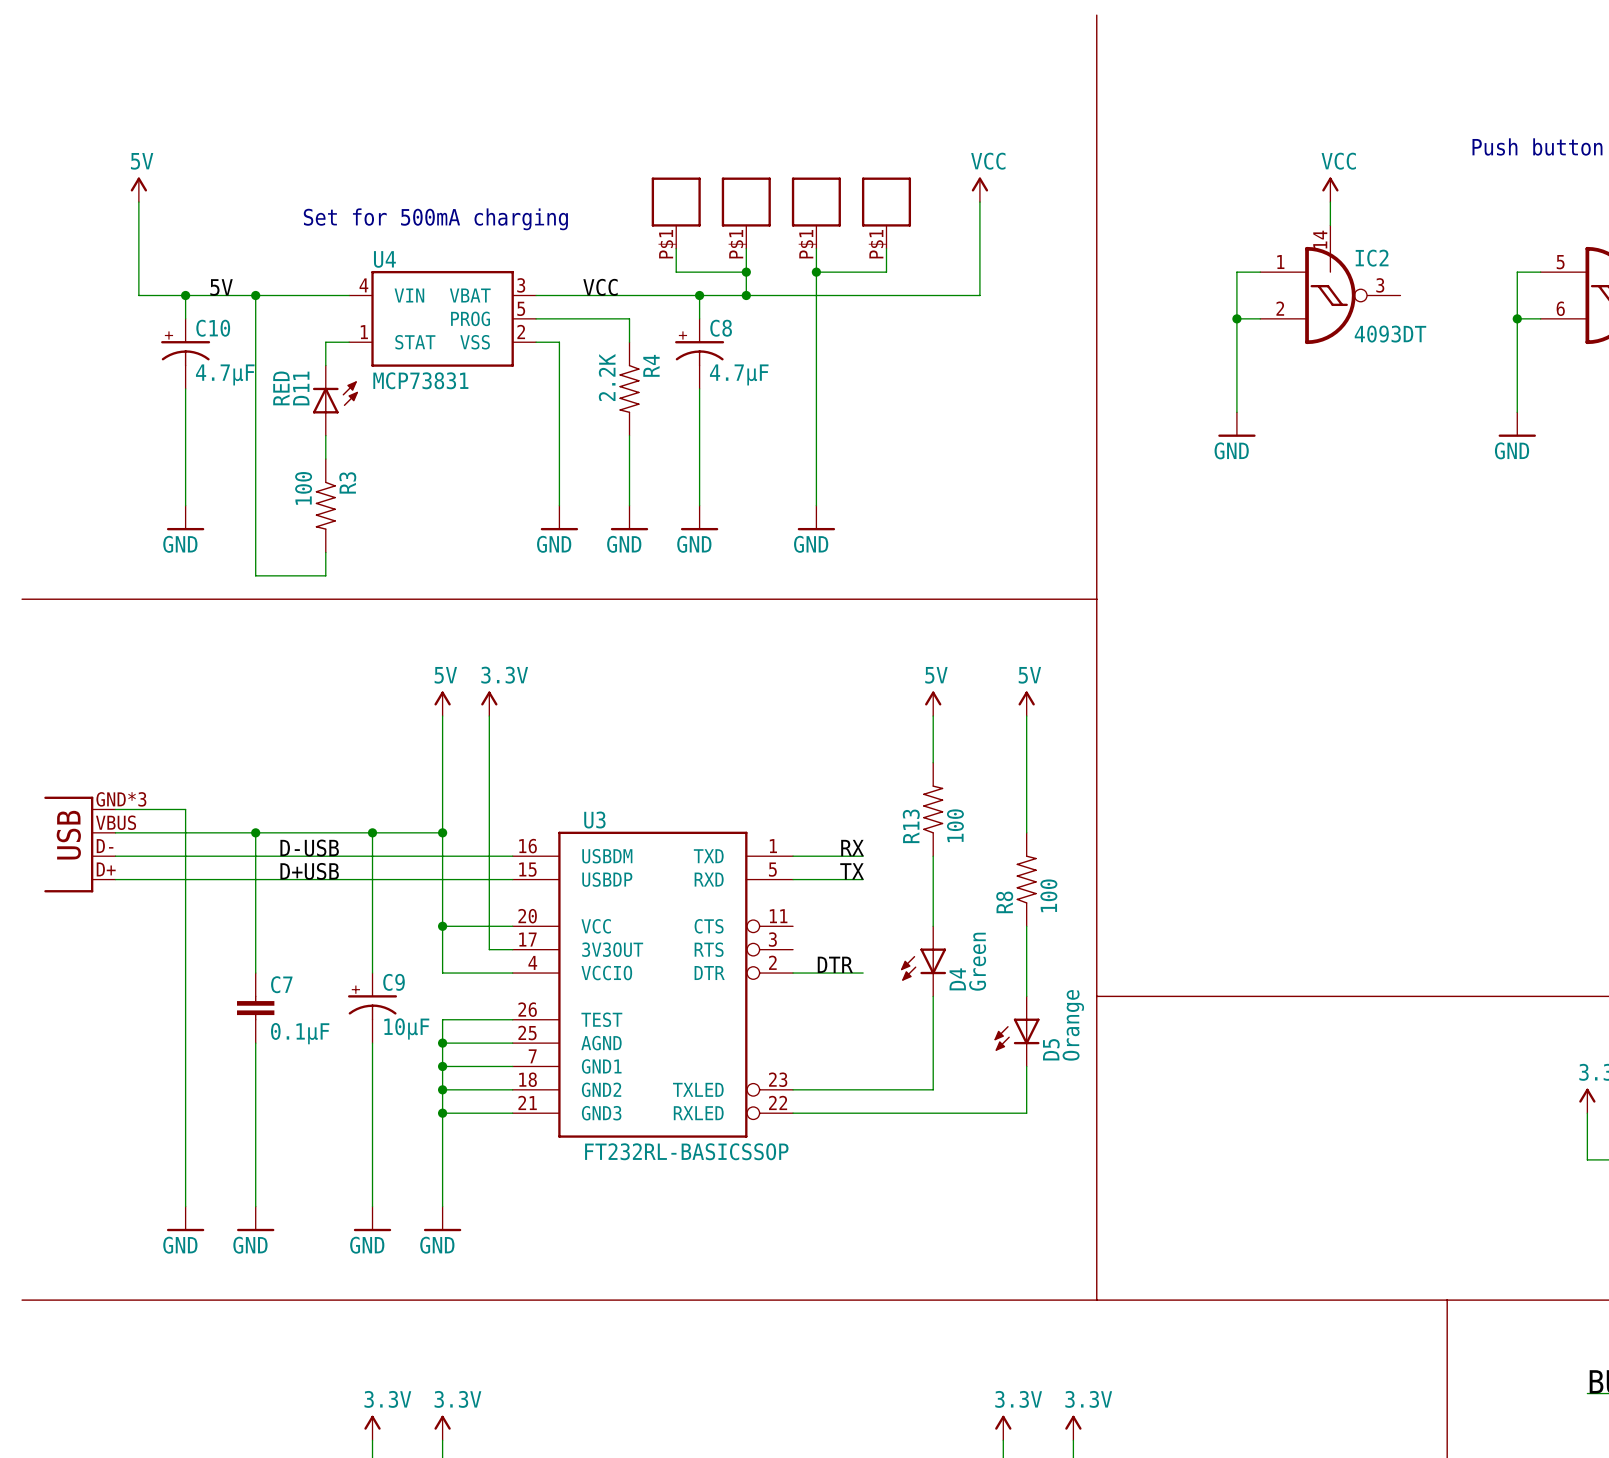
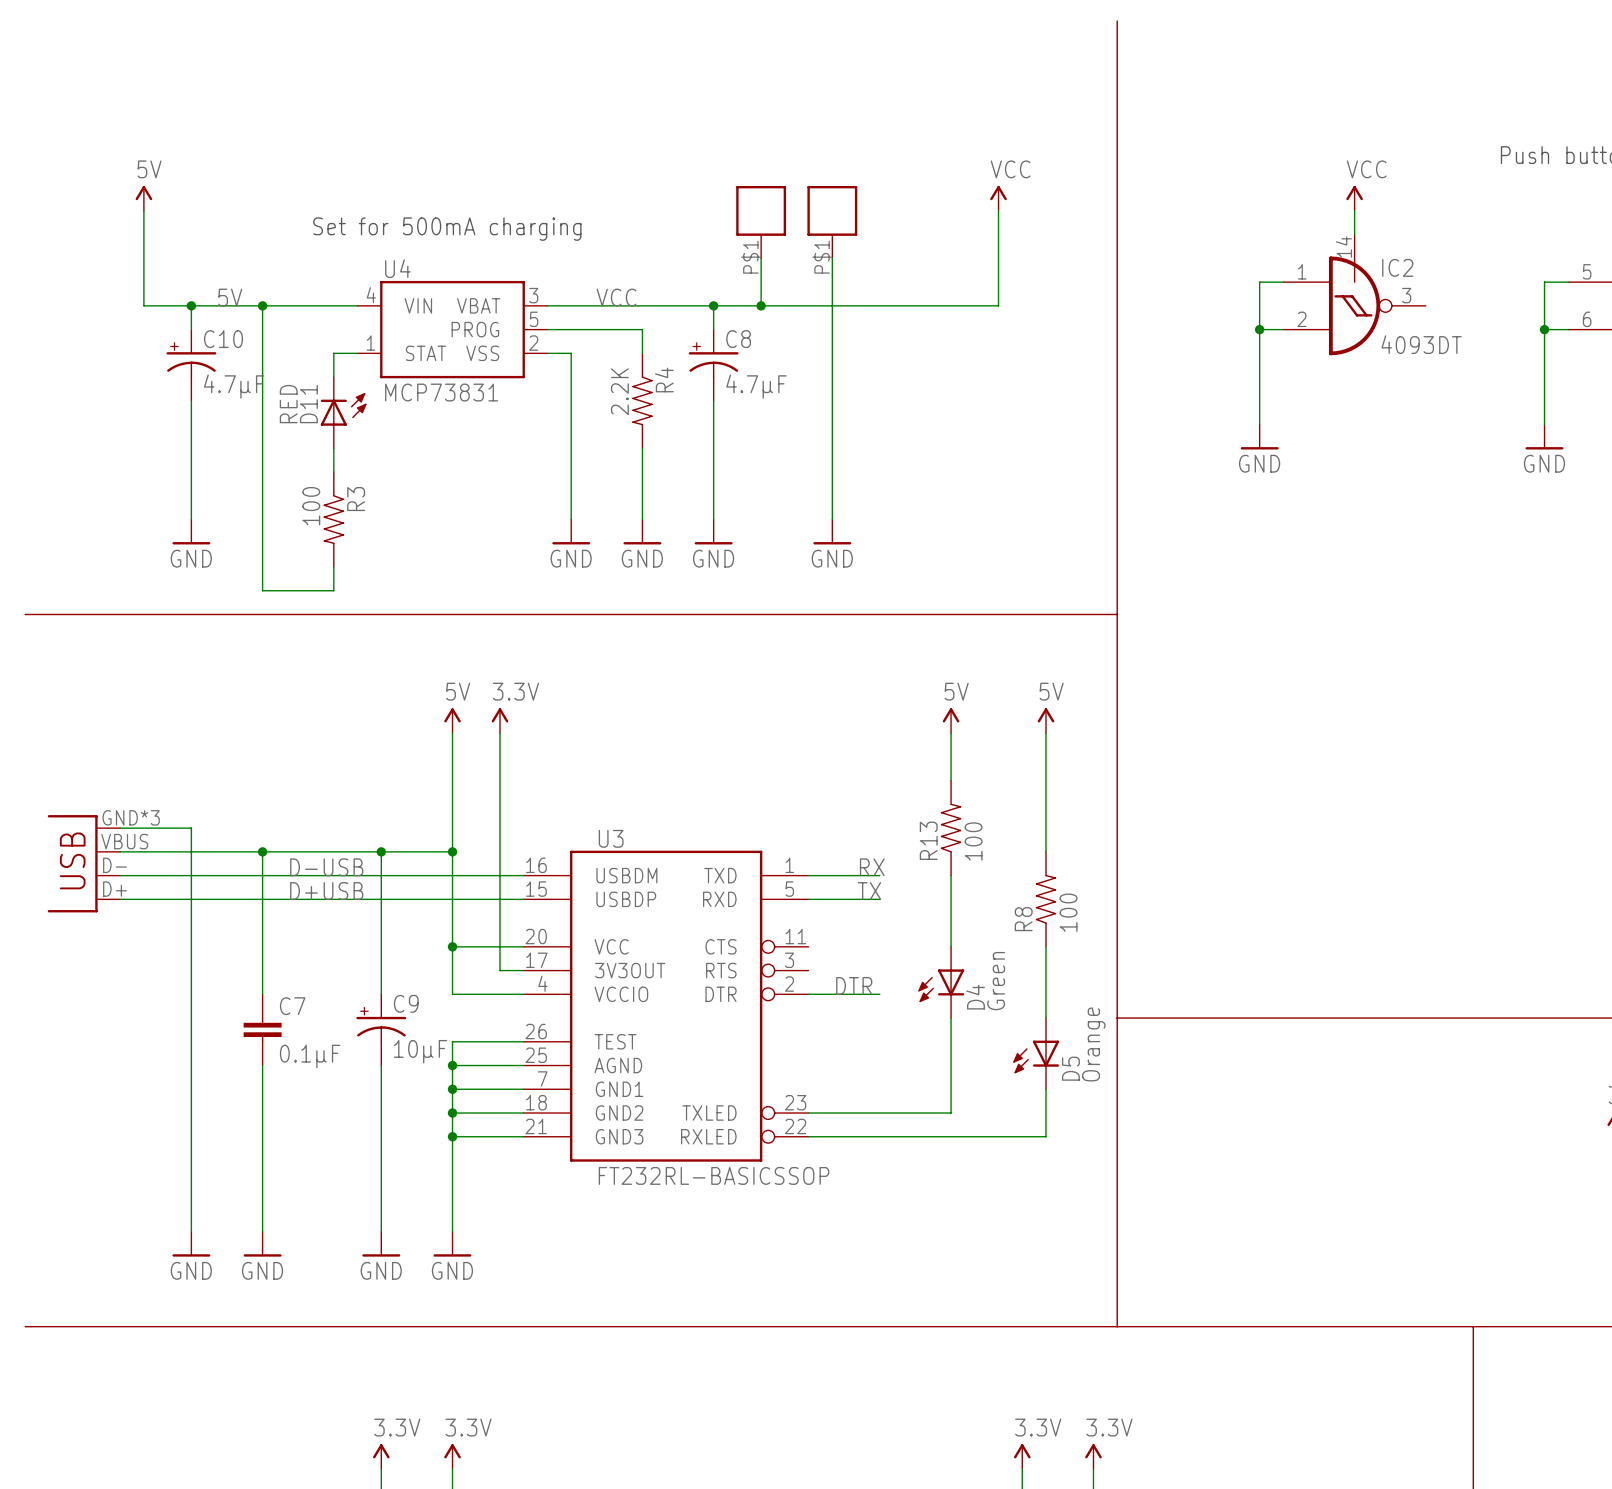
part: (676, 213) -> none
part: (886, 213) -> none
wire: (676, 248) (676, 272) (746, 272) -> none
wire: (886, 248) (886, 272) (816, 272) -> none
junction: (746, 272) -> none
junction: (816, 272) -> none

